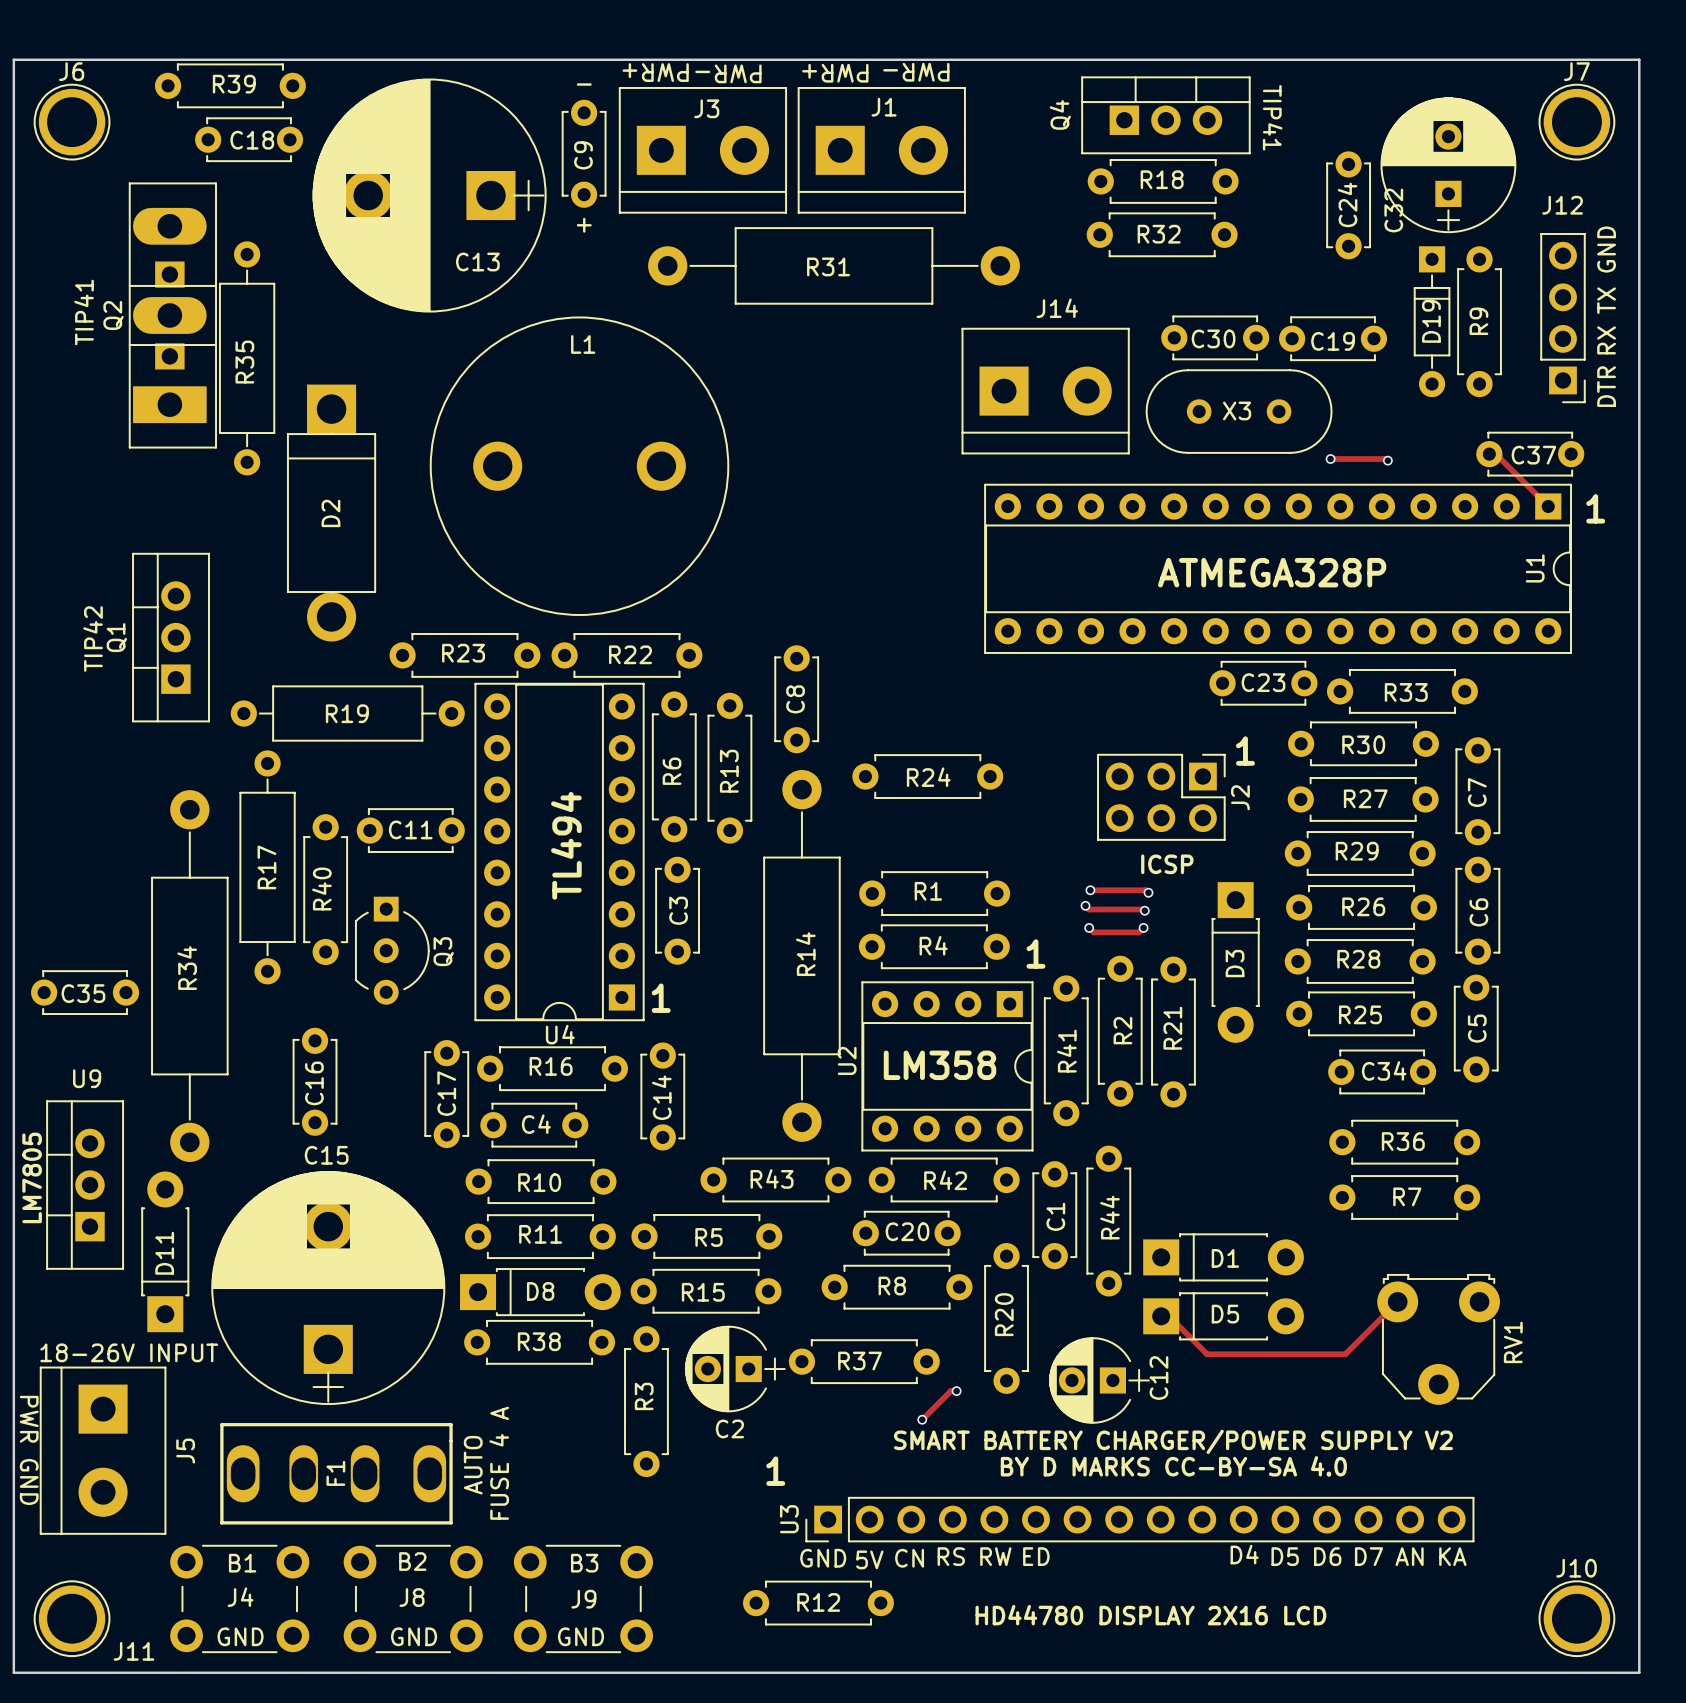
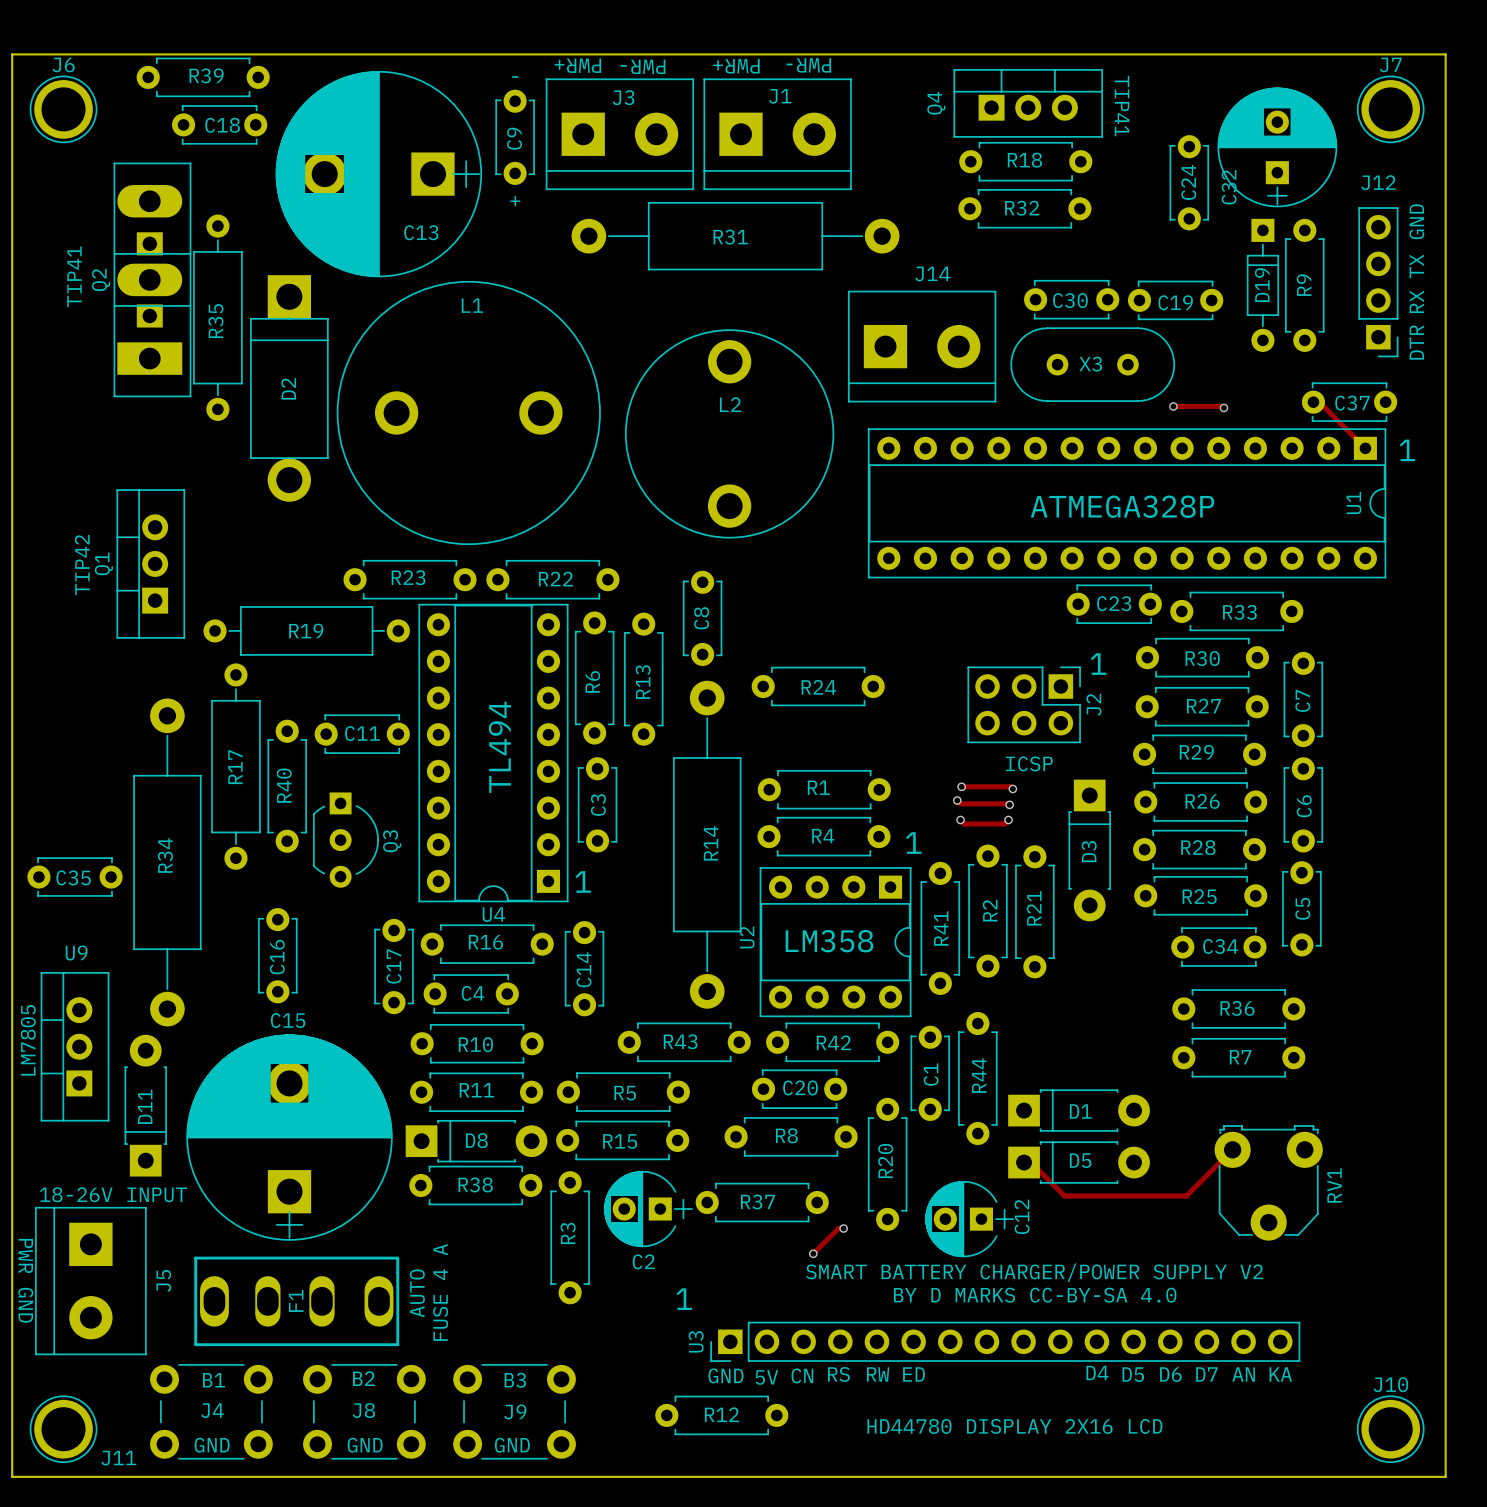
L1 position: (579, 466) -> (468, 412)
L2: none -> (729, 433)
D2 position: (331, 513) -> (289, 388)

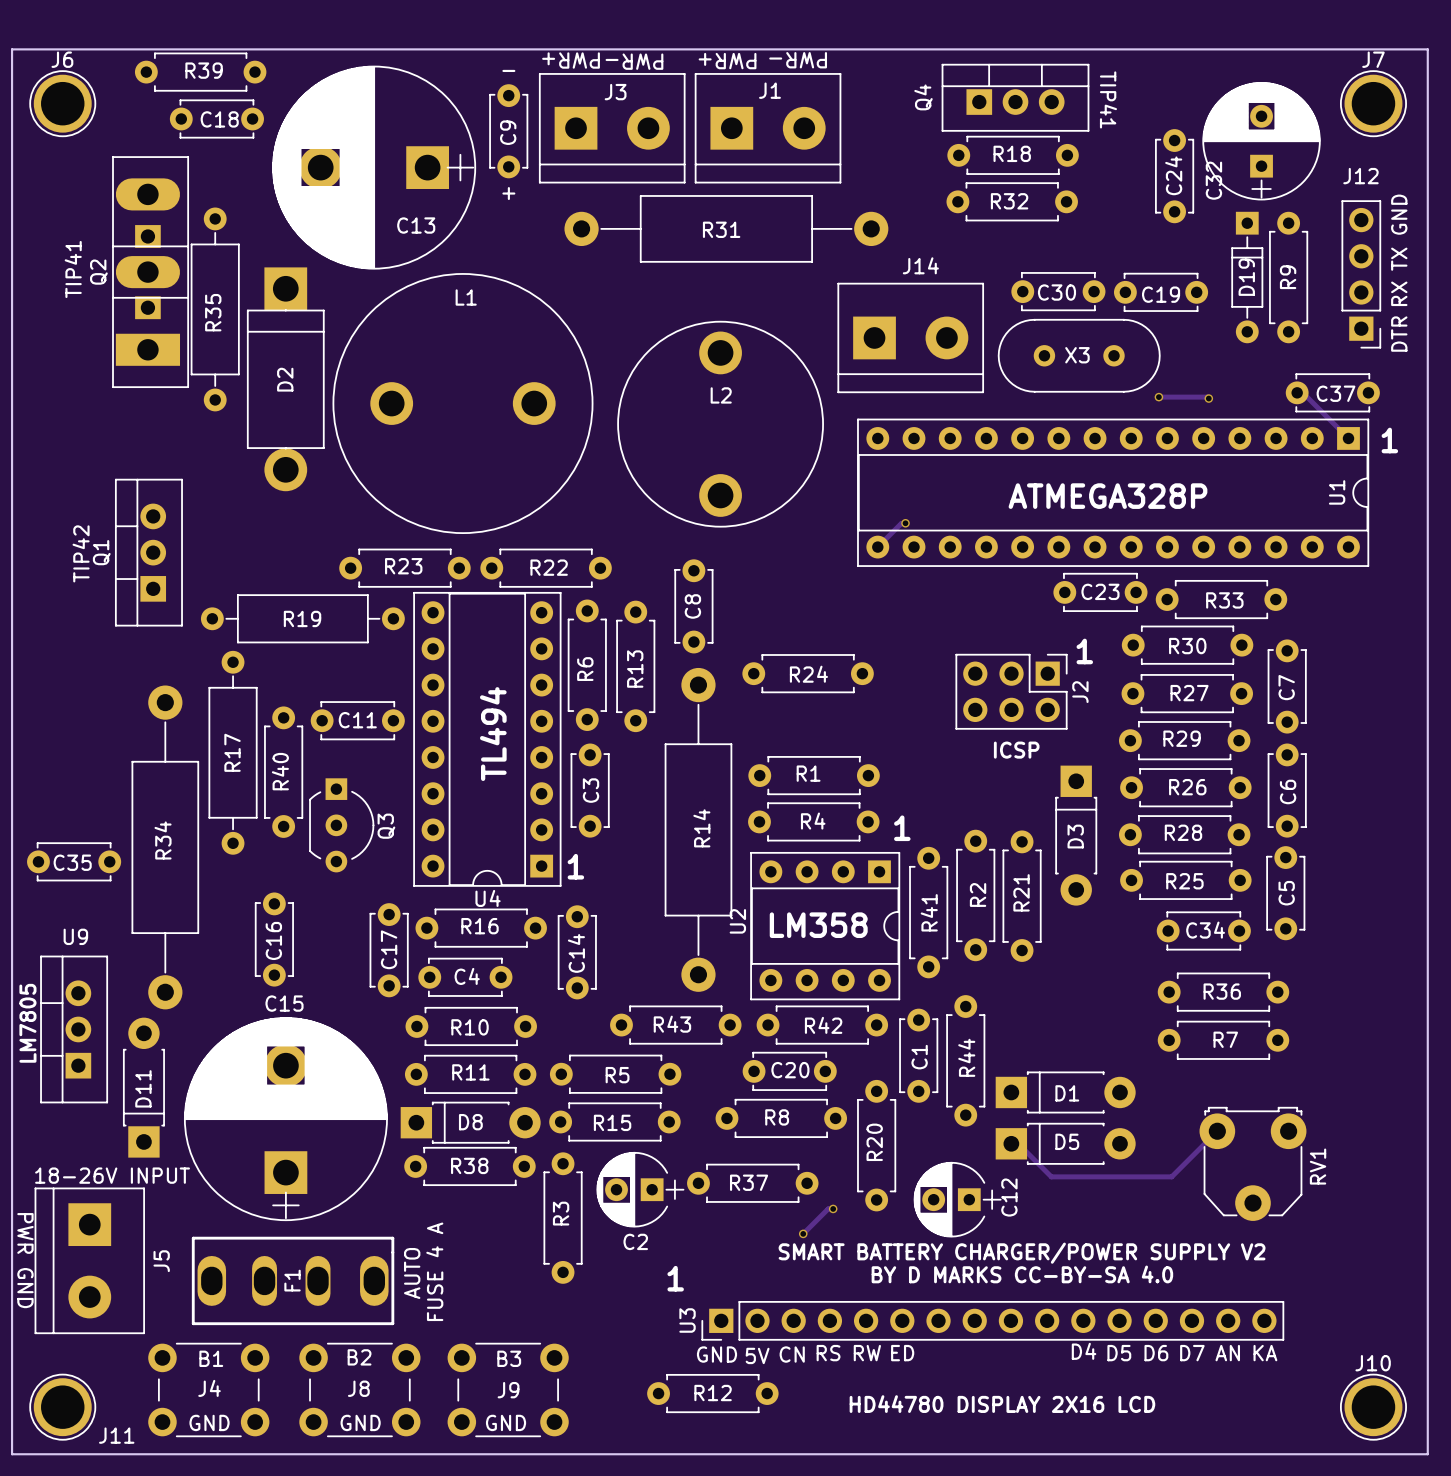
track: none -> (905, 523) (901, 523) (877, 547)
via: none -> (905, 523)
track: (961, 786) (1010, 786) (1012, 788) -> none
via: (961, 786) -> none
via: (1012, 788) -> none
track: (957, 800) (960, 803) (1009, 804) -> none
via: (957, 800) -> none
via: (1009, 804) -> none
track: (960, 820) (964, 823) (1004, 823) (1008, 820) -> none
via: (960, 820) -> none
via: (1008, 820) -> none

